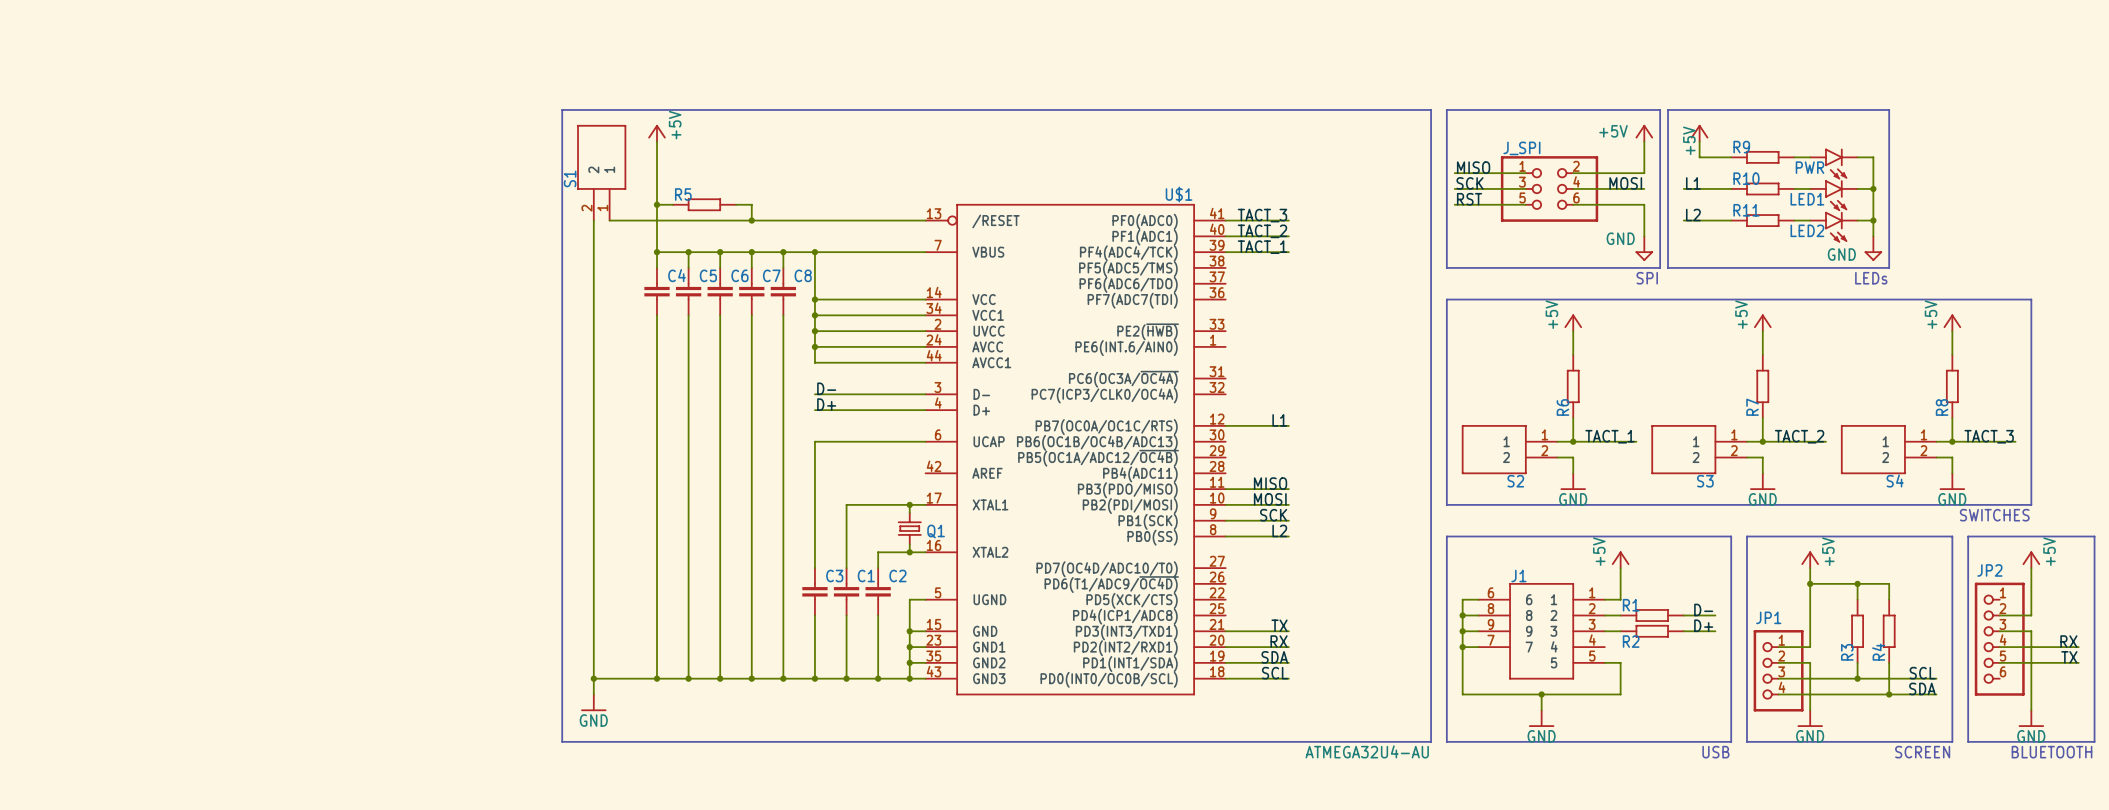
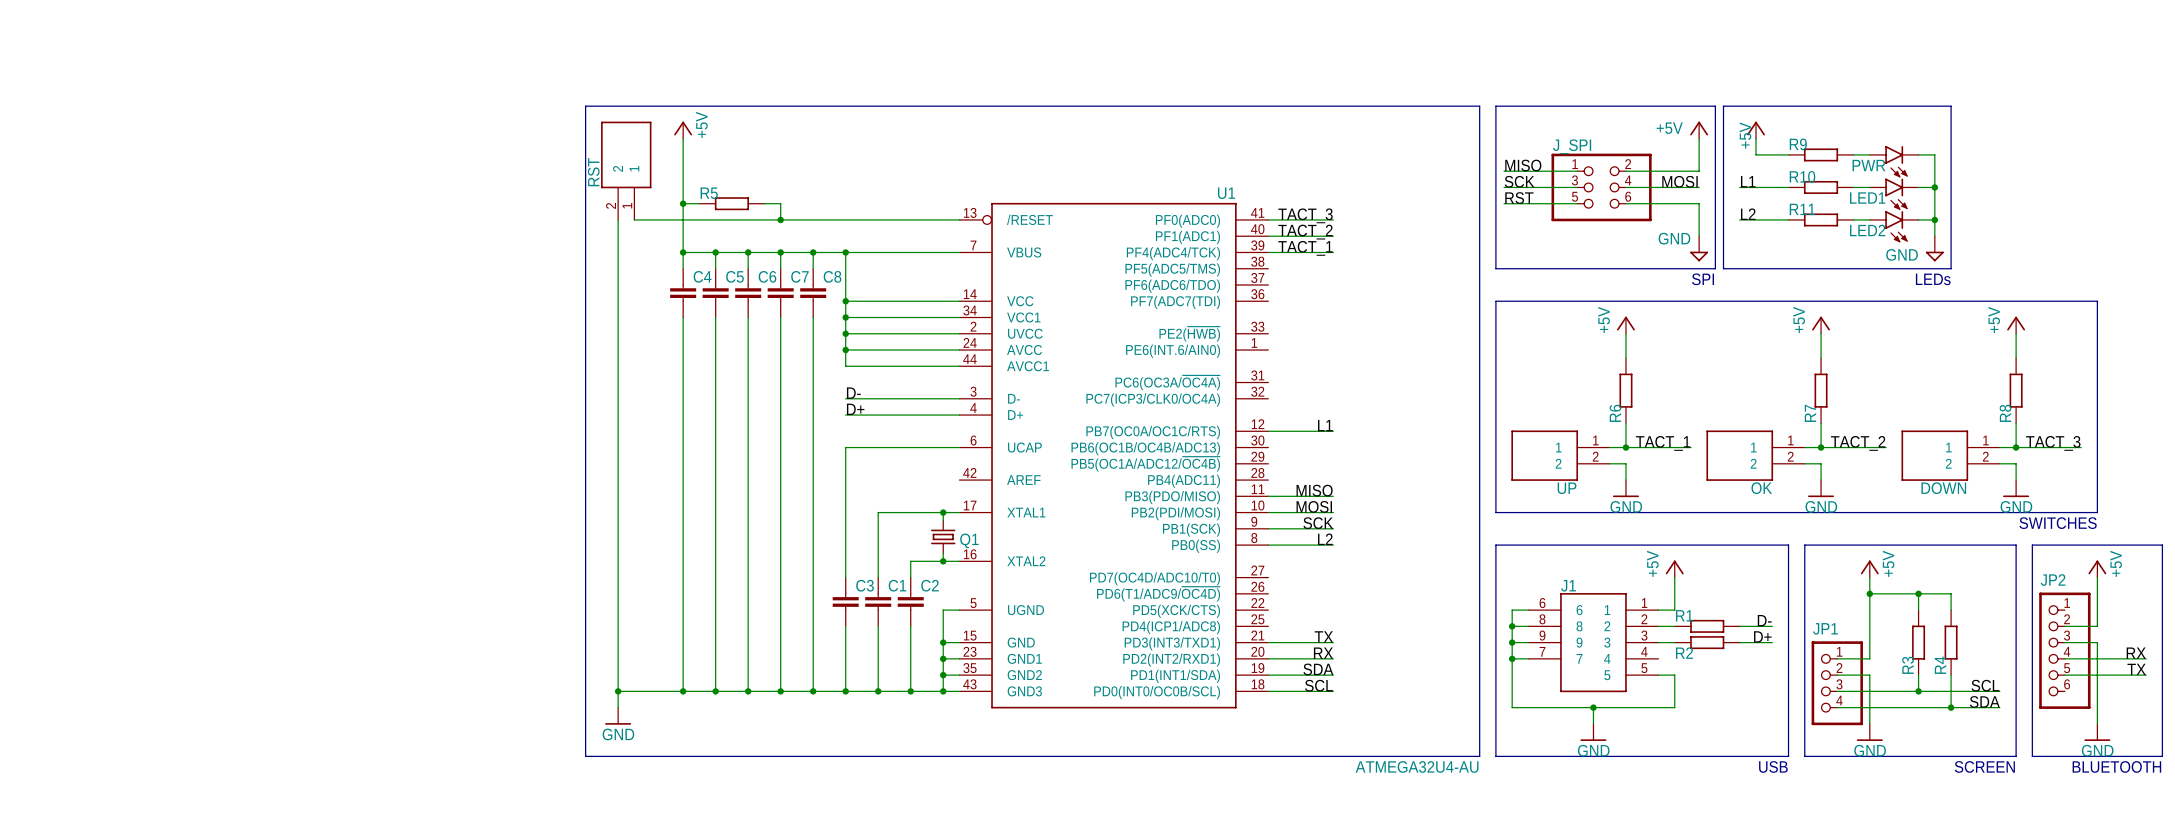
S1 name: S1 (570, 178) -> RST (593, 172)
U$1 name: U$1 (1179, 194) -> U1 (1226, 193)
S4 name: S4 (1895, 480) -> DOWN (1943, 488)
S2 name: S2 (1515, 481) -> UP (1567, 488)
S3 name: S3 (1705, 481) -> OK (1761, 488)

